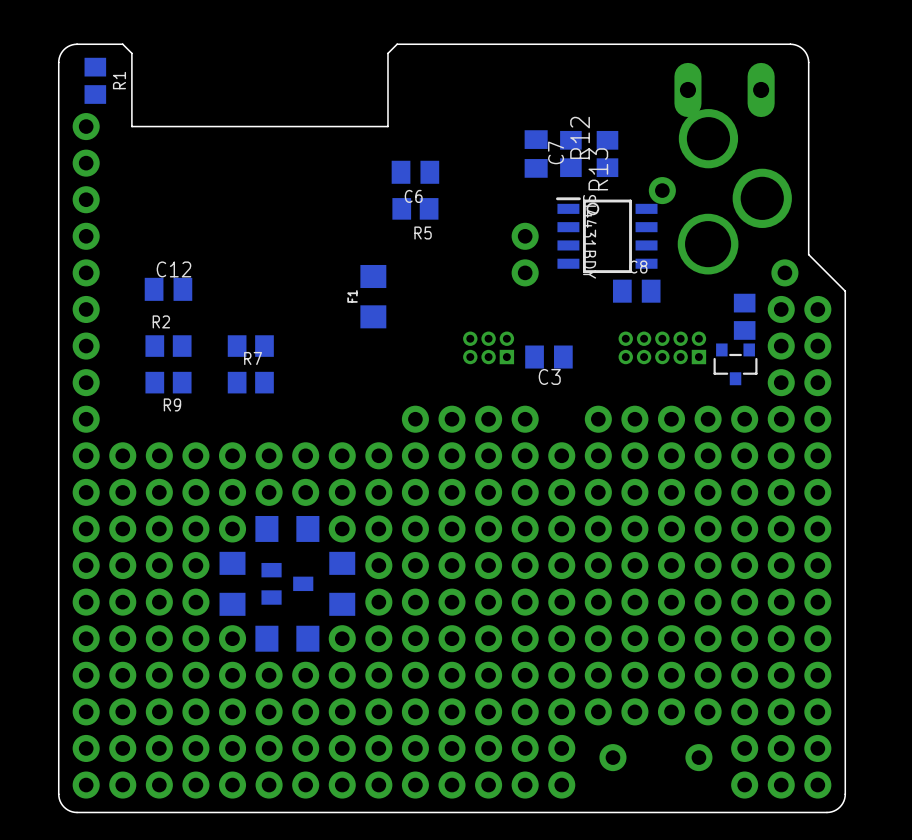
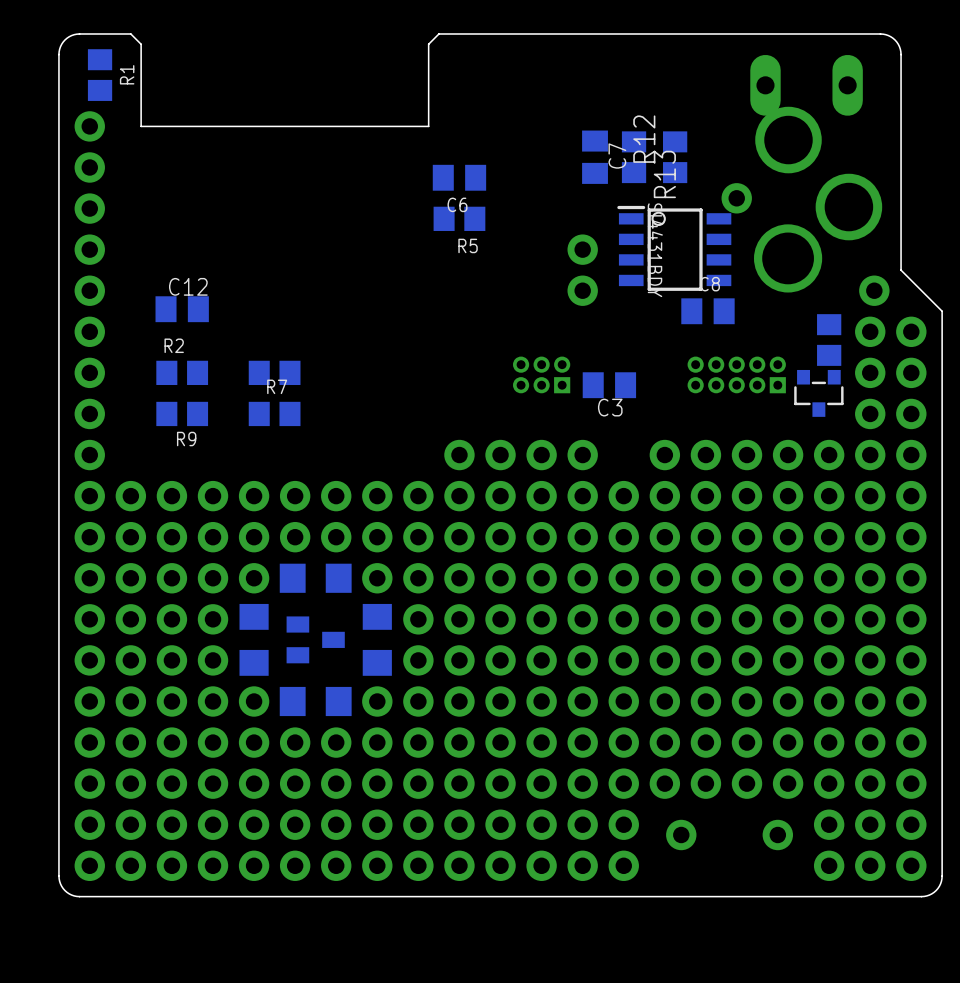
F1: (373, 296) -> none

